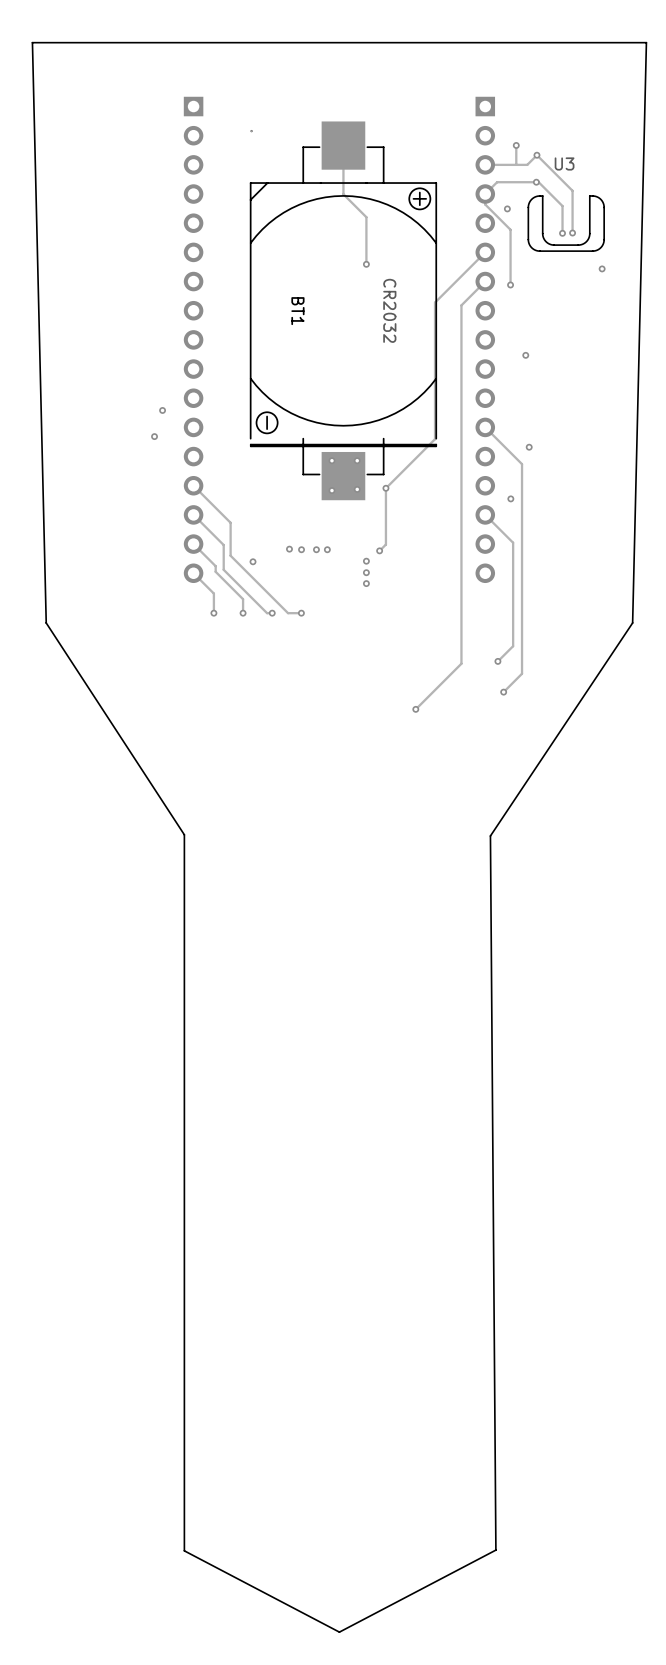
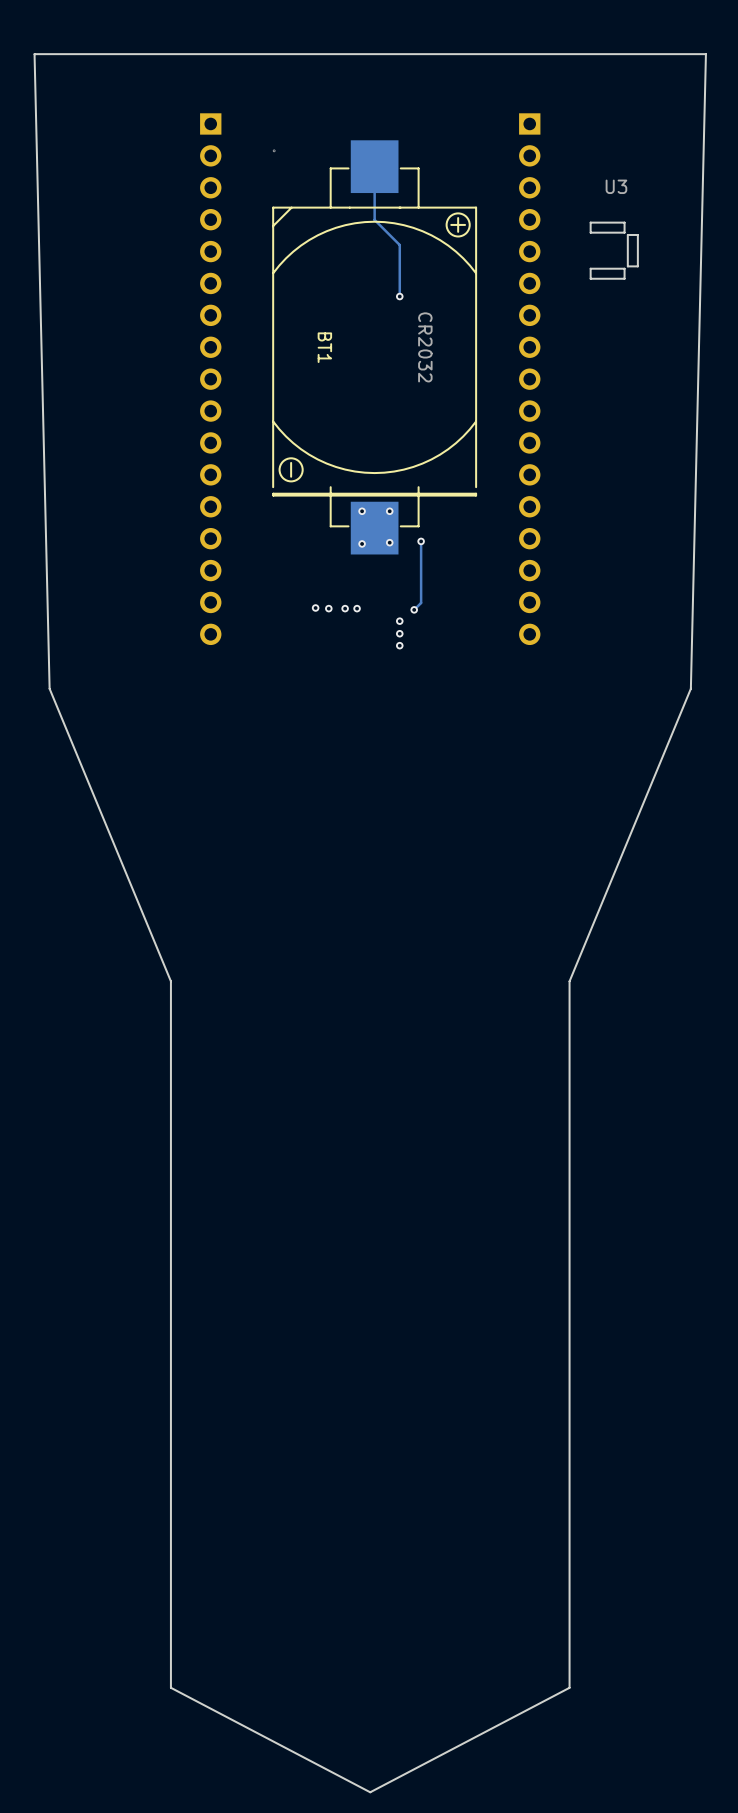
track: (516, 145) (516, 164) -> none
via: (516, 145) -> none
via: (536, 155) -> none
track: (485, 164) (527, 164) (536, 155) (572, 190) (572, 233) -> none
via: (536, 182) -> none
board edge: (592, 195) (589, 195) (589, 237) (584, 243) (578, 245) (552, 245) (546, 241) (542, 234) (542, 195) (532, 198) (528, 207) (528, 240) (530, 246) (539, 251) (592, 251) (599, 248) (604, 240) (604, 206) (600, 199) (592, 195) -> none
board edge: none -> (624, 222) (590, 222) (590, 232) (624, 232) (624, 222)
via: (507, 208) -> none
board edge: none -> (637, 234) (627, 234) (627, 266) (637, 266) (637, 234)
track: (562, 233) (562, 206) (538, 182) (497, 182) (485, 194) (485, 204) (510, 229) (510, 285) -> none
via: (562, 233) -> none
via: (572, 233) -> none
board edge: none -> (624, 268) (624, 278) (590, 278) (590, 268) (624, 268)
track: (485, 252) (435, 302) (435, 439) (385, 488) -> none
via: (602, 268) -> none
track: (485, 281) (461, 305) (461, 663) (415, 709) -> none
via: (510, 285) -> none
via: (525, 355) -> none
via: (162, 410) -> none
track: (485, 427) (522, 464) (522, 673) (503, 692) -> none
via: (154, 436) -> none
via: (529, 447) -> none
track: (193, 485) (230, 522) (230, 555) (288, 613) (301, 613) -> none
via: (510, 498) -> none
track: (193, 514) (223, 545) (223, 569) (267, 613) (272, 613) -> none
track: (485, 514) (513, 542) (513, 646) (497, 661) -> none
track: (193, 544) (215, 566) (215, 571) (243, 599) (243, 613) -> none
via: (253, 561) -> none
track: (193, 573) (213, 593) (213, 613) -> none
via: (213, 613) -> none
via: (243, 613) -> none
via: (272, 613) -> none
via: (301, 613) -> none
board edge: (46, 622) (184, 834) (184, 1550) -> (49, 688) (170, 981) (170, 1687) (200, 1703)
board edge: (632, 622) (490, 835) (495, 1550) -> (690, 688) (569, 981) (569, 1687) (541, 1702)
via: (497, 661) -> none
via: (503, 692) -> none
via: (415, 709) -> none

